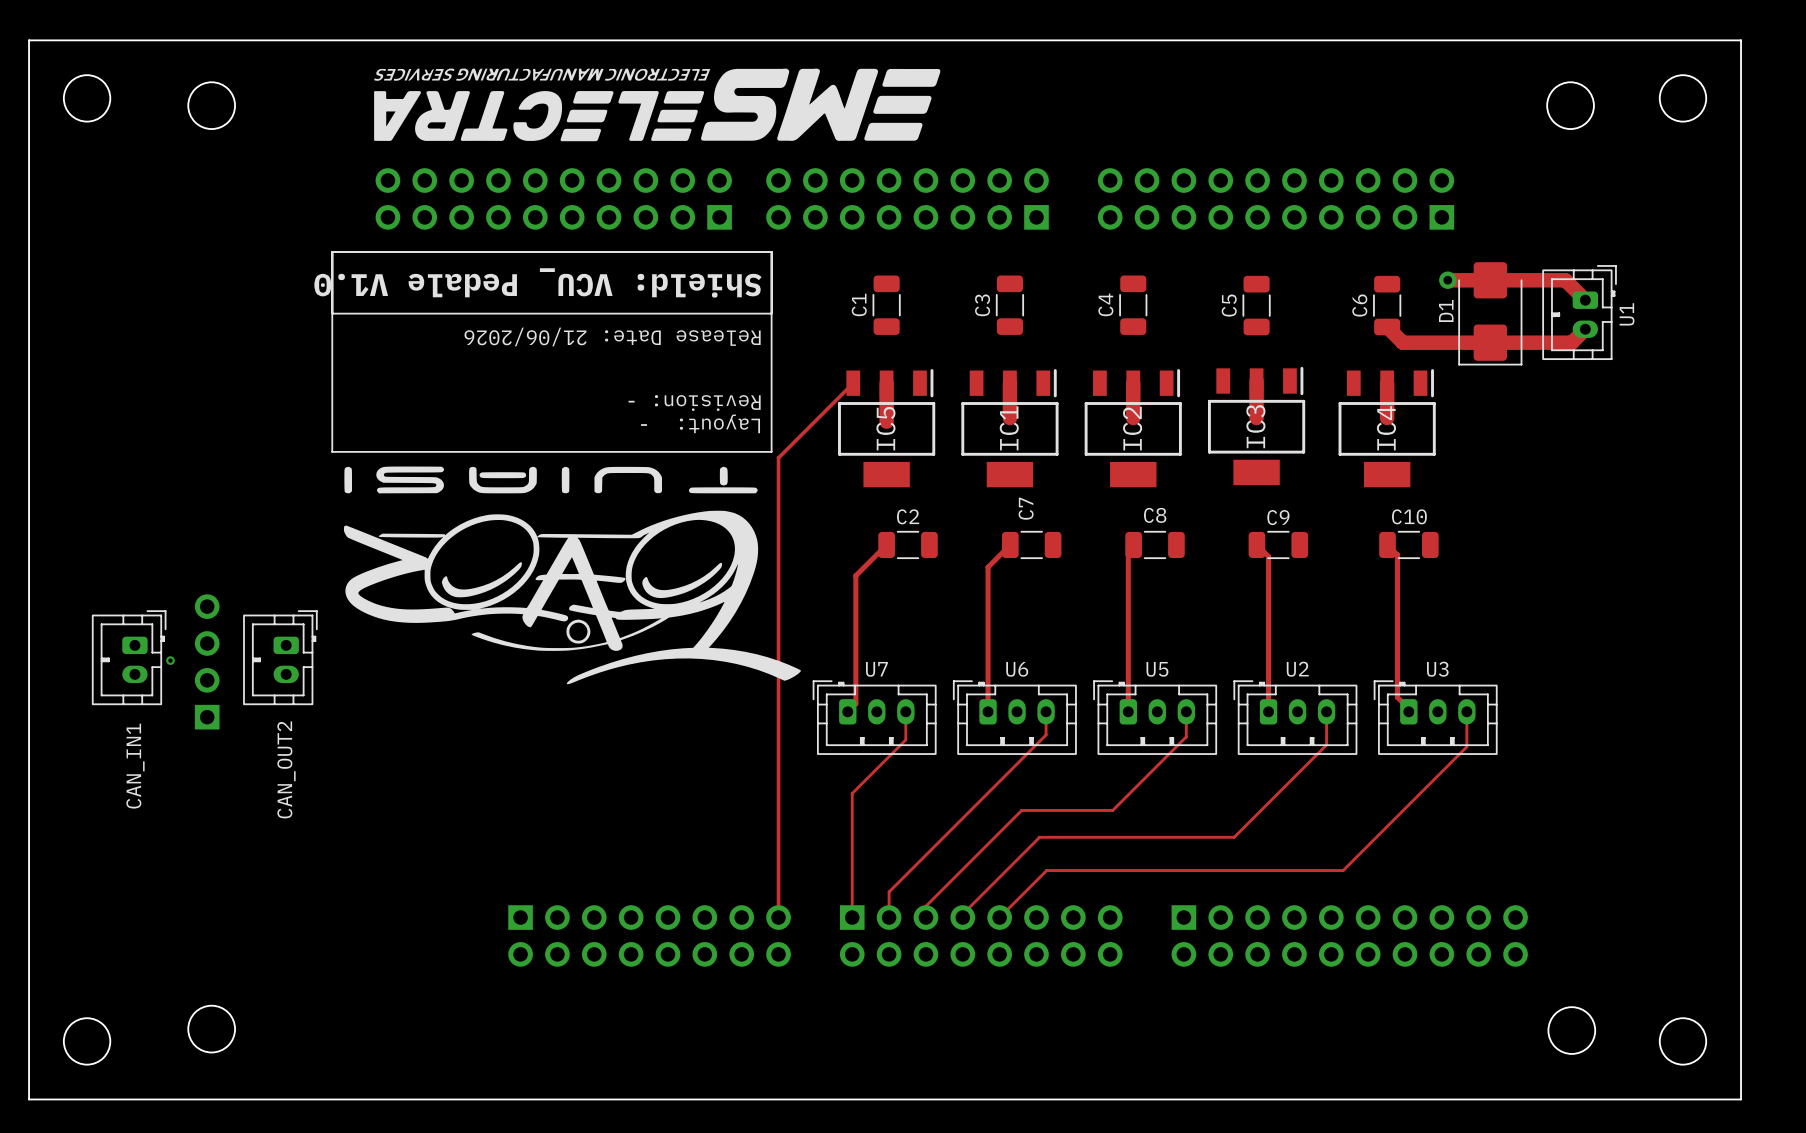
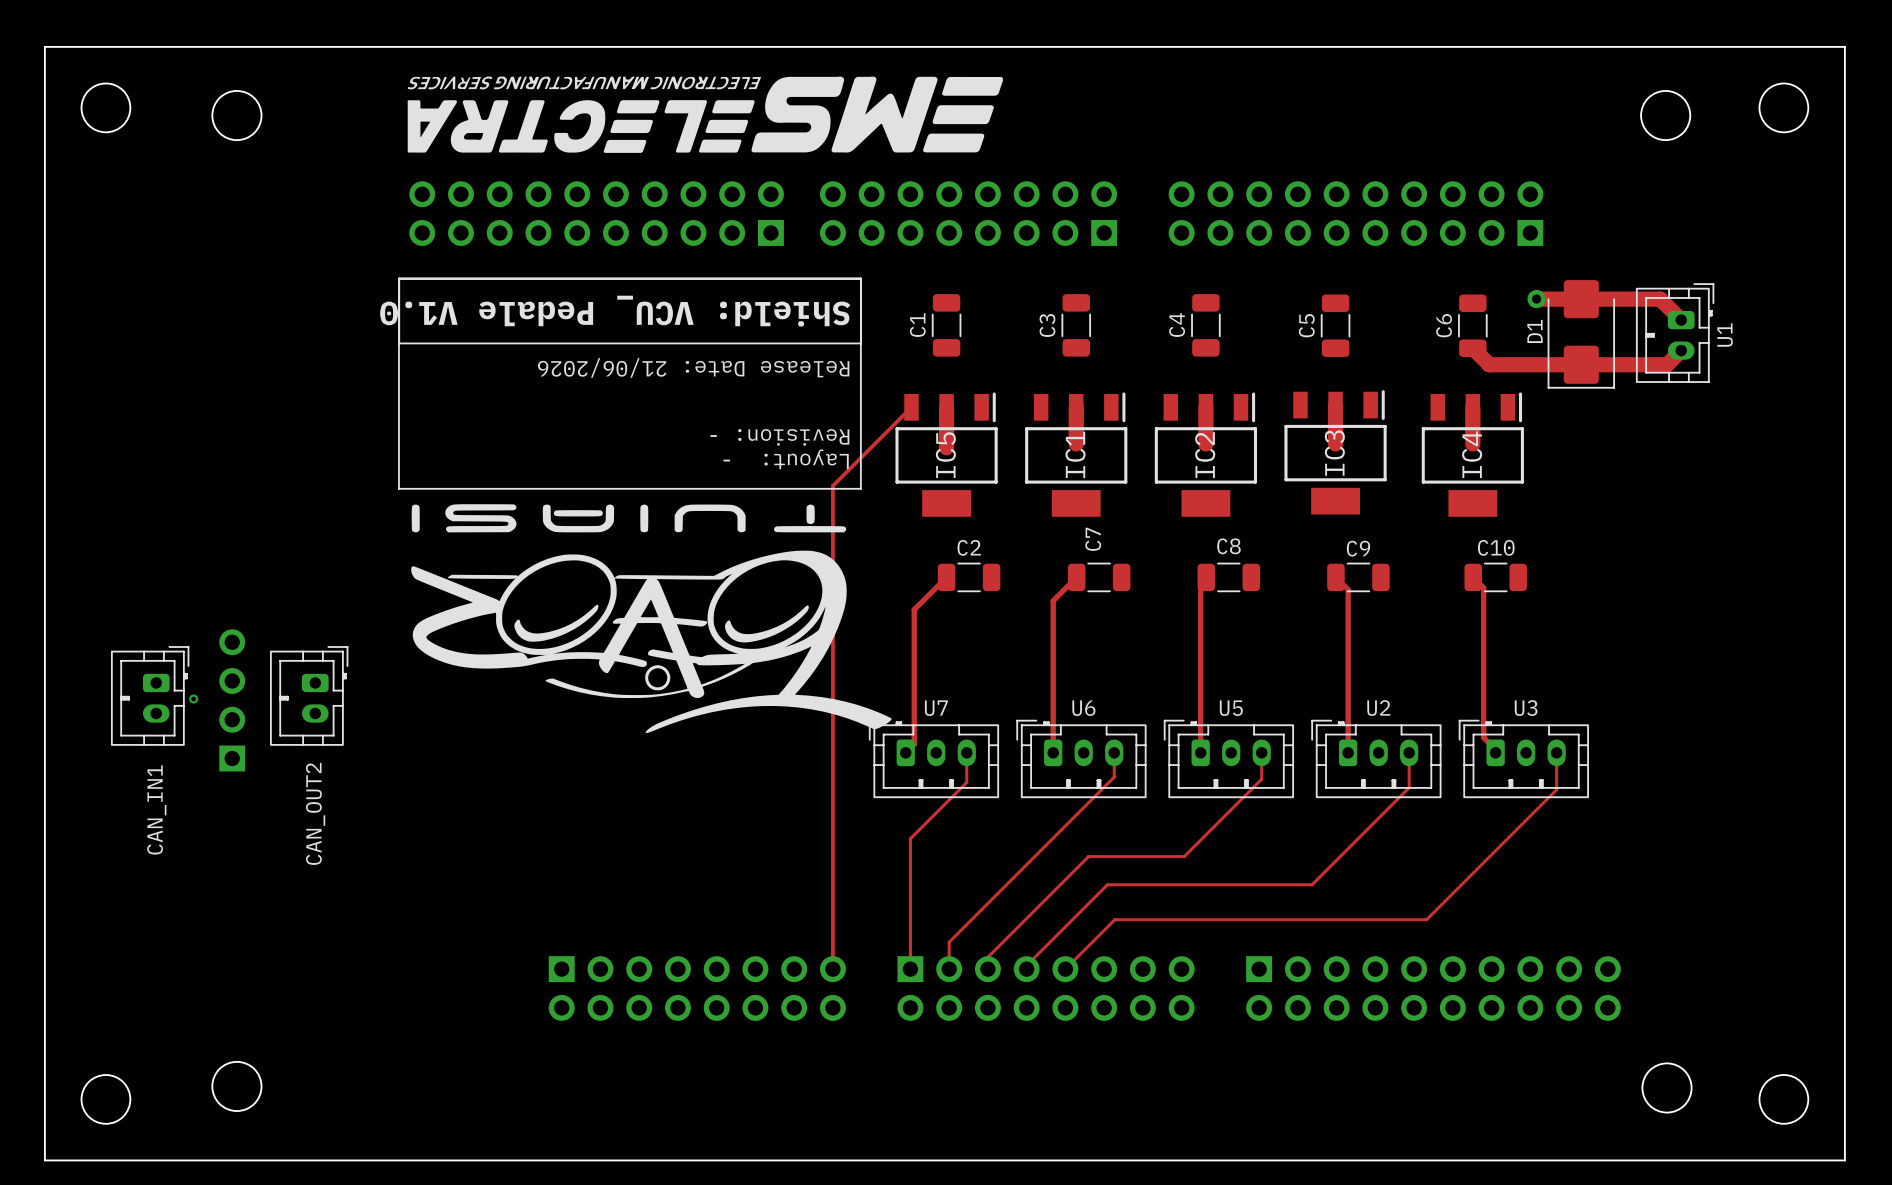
line: (332, 251) (332, 313) (771, 313) -> (399, 278) (399, 343) (860, 343)
line: (332, 251) (332, 451) (771, 451) (771, 251) (332, 251) -> (398, 278) (398, 488) (860, 488) (860, 278) (398, 278)
text position: Shield: VCU_ Pedale V1.0 (537, 282) -> Shield: VCU_ Pedale V1.0 (615, 311)
text position: Release Date: 21/06/2026 (612, 336) -> Release Date: 21/06/2026 (693, 367)
text position: Revision: - (694, 402) -> Revision: - (779, 437)
text position: Layout: - (700, 423) -> Layout: - (786, 459)
drawing position: (572, 575) -> (651, 618)

